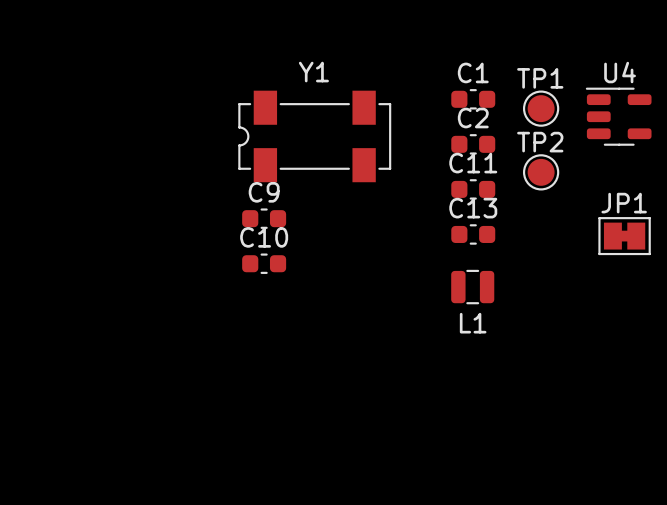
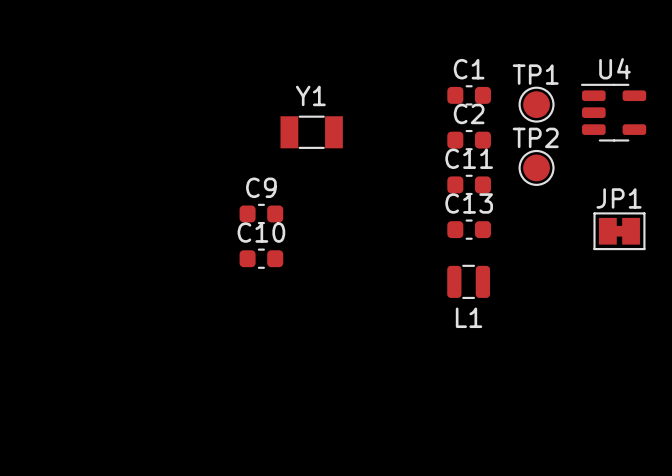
Y1 footprint: [238, 90, 392, 183] -> [280, 115, 343, 149]

